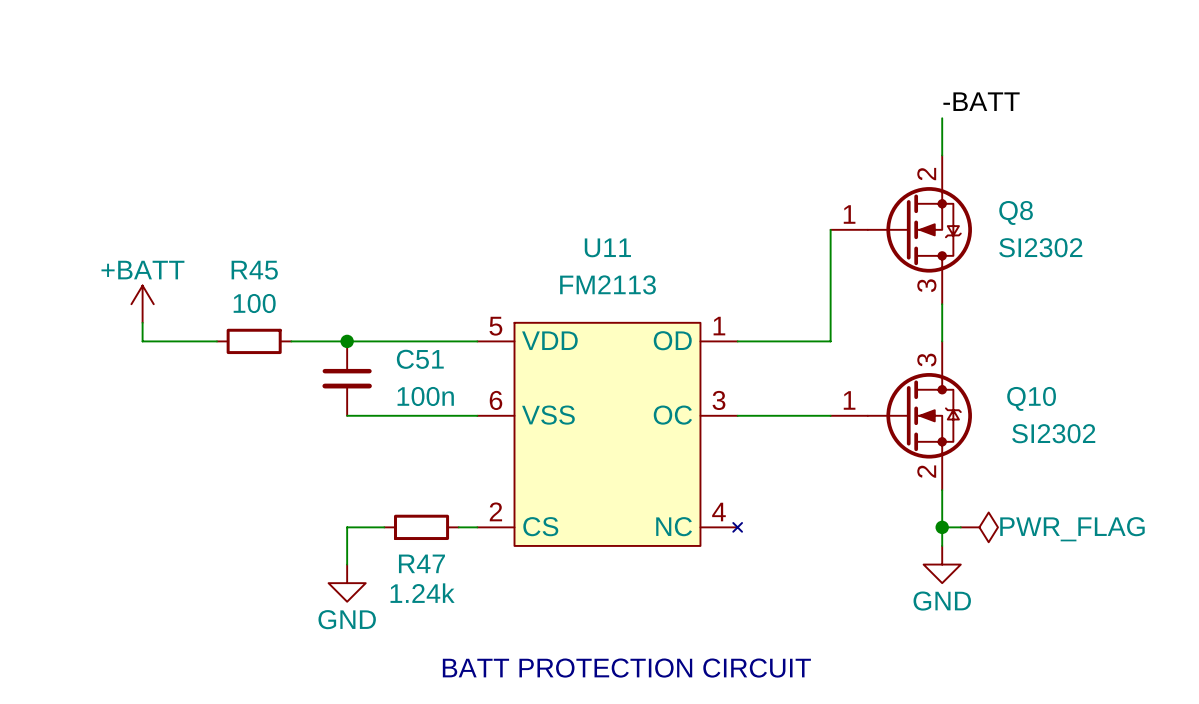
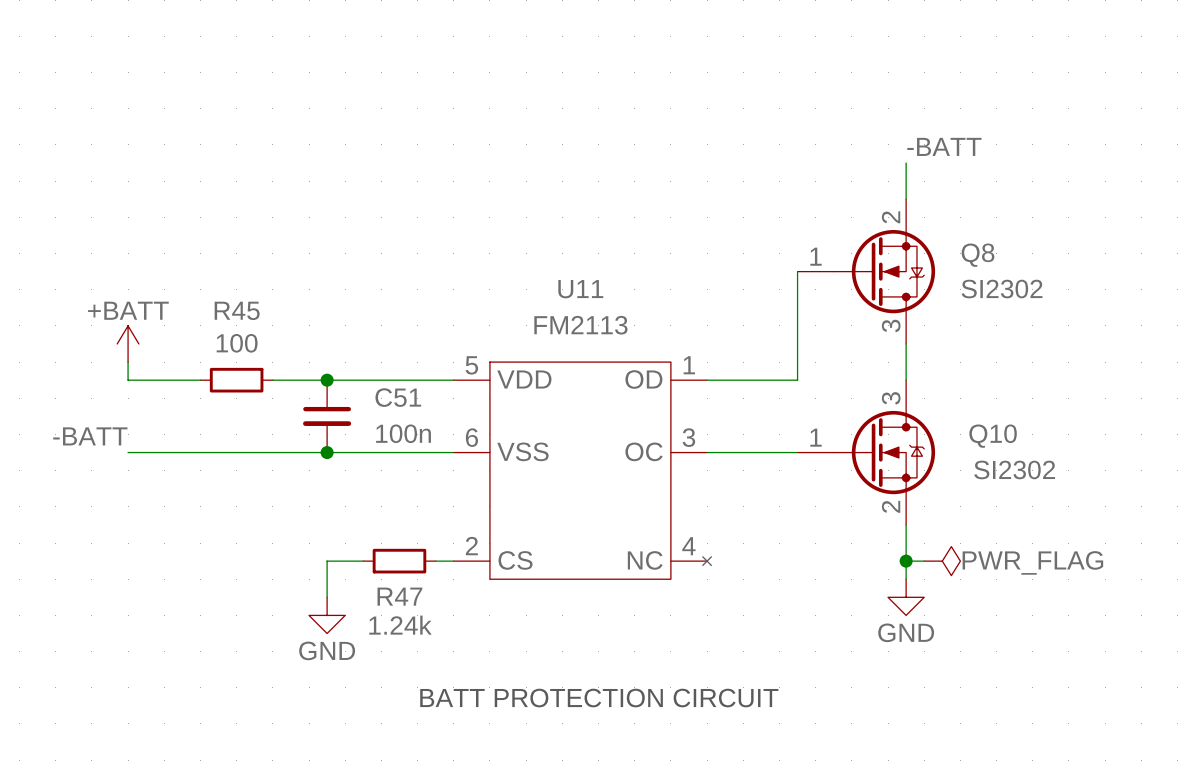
label: none -> -BATT (90, 436)
wire: none -> (128, 452) (327, 452)
junction: none -> (327, 452)

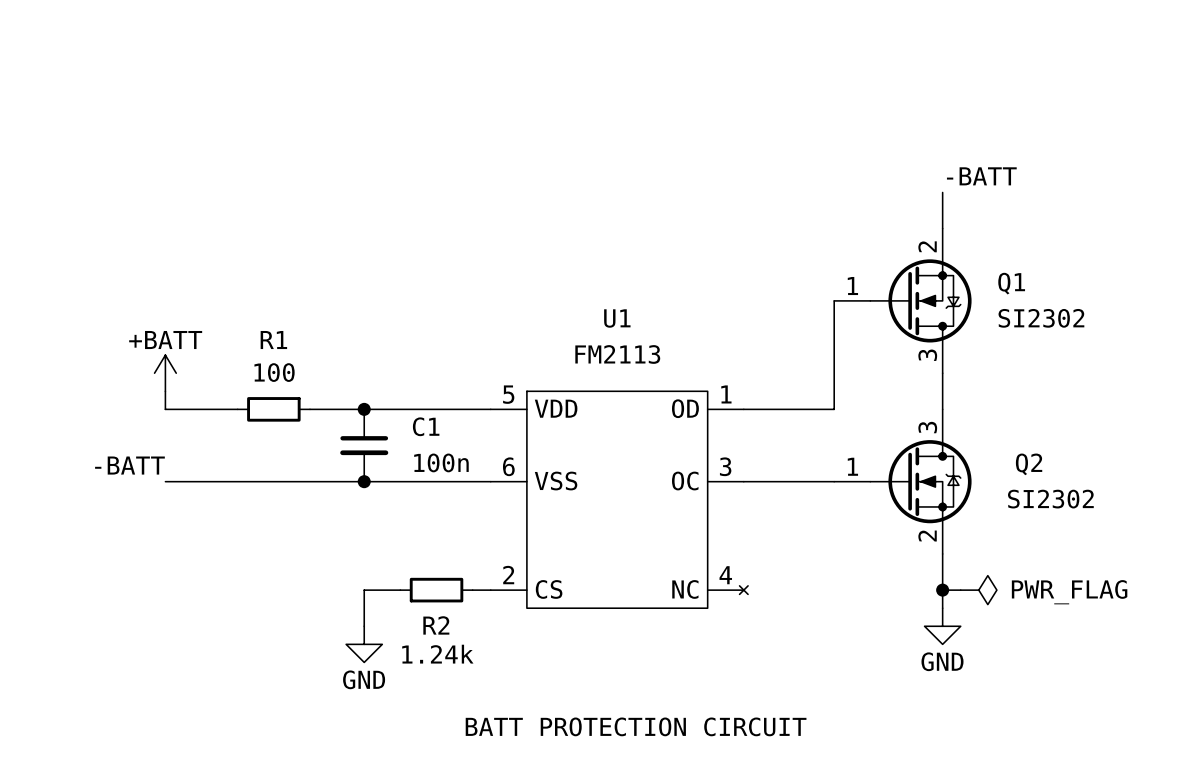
Q8 name: Q8 (978, 255) -> Q1 (1011, 283)
U11 name: U11 (580, 289) -> U1 (617, 318)
R45 name: R45 (237, 310) -> R1 (273, 340)
C51 name: C51 (398, 397) -> C1 (426, 426)
Q10 name: Q10 (993, 436) -> Q2 (1029, 464)
R47 name: R47 (399, 596) -> R2 (436, 625)

